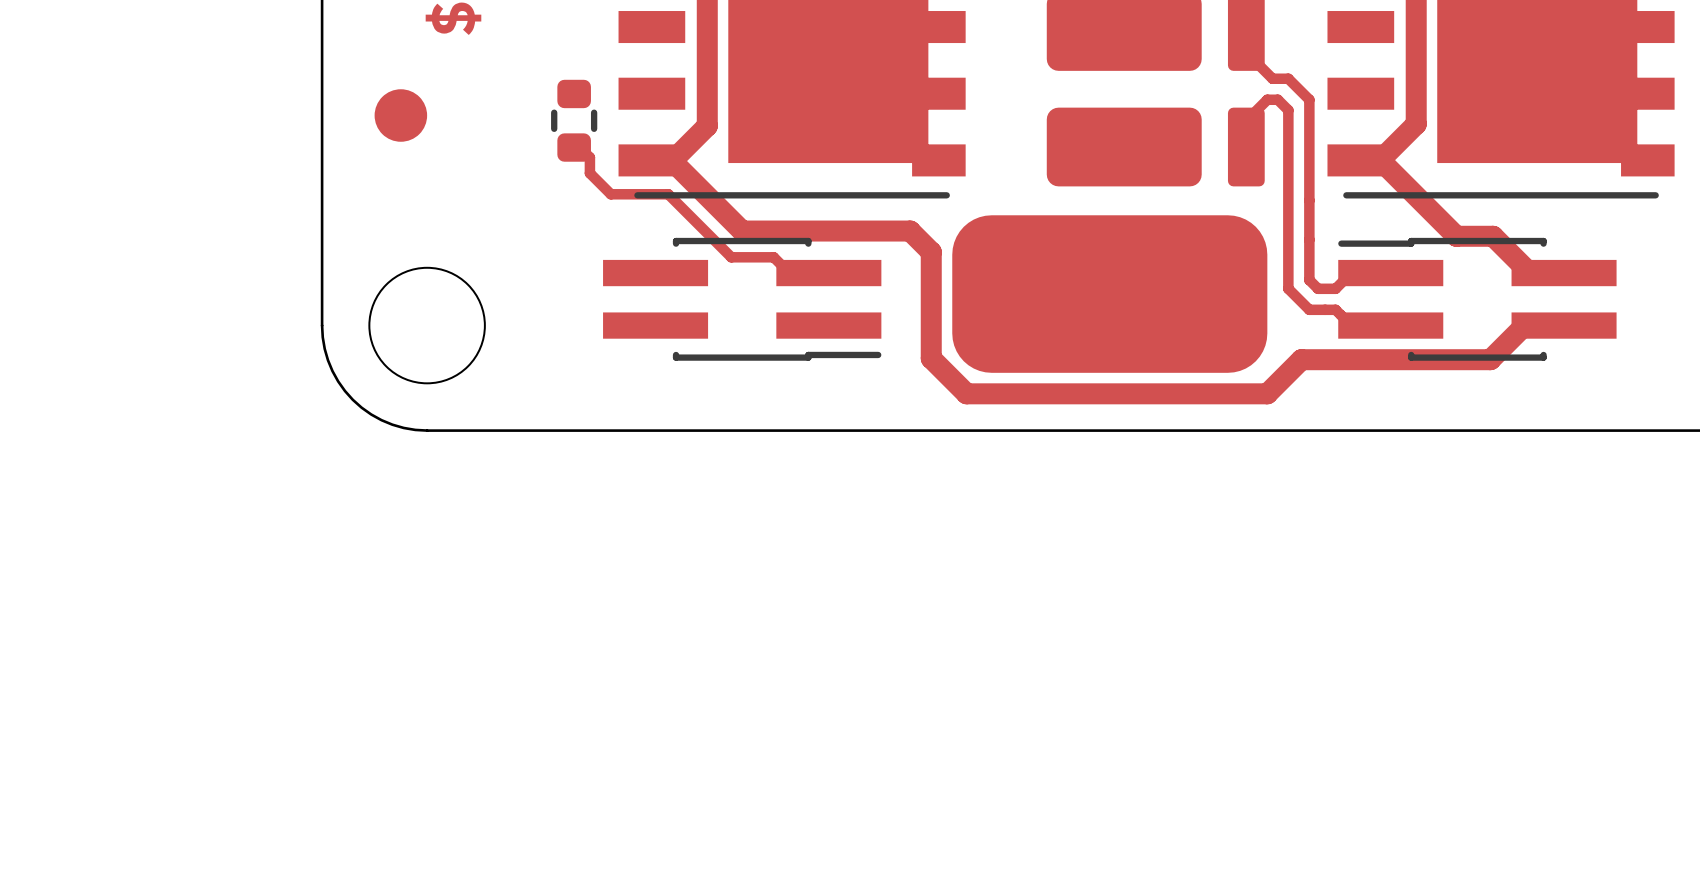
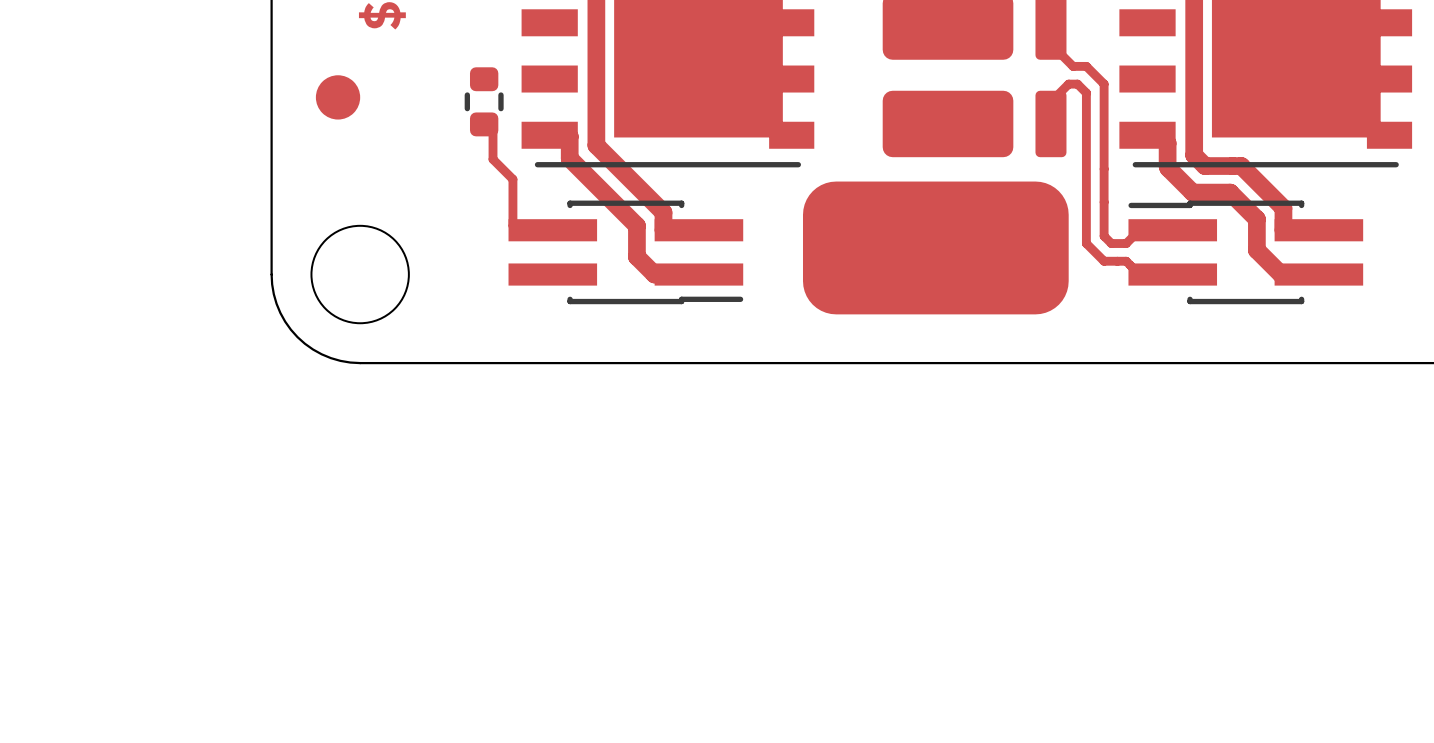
track: (1416, 124) (1379, 160) -> (1194, 104) (1194, 155) (1204, 166) (1241, 166) (1283, 208) (1283, 230) (1290, 230)
track: (707, 126) (672, 160) -> (698, 274) (654, 274) (636, 256) (636, 225) (569, 158) (569, 136) (567, 135)
track: (577, 147) (579, 147) (589, 157) (589, 173) (610, 194) (668, 194) (731, 257) (773, 257) (789, 273) -> (596, 106) (596, 145) (663, 212) (663, 230) (665, 230)
track: none -> (486, 124) (493, 130) (493, 159) (512, 179) (512, 225) (517, 230) (552, 230)
track: (671, 160) (742, 231) (910, 231) (931, 252) (931, 358) (966, 393) (1267, 393) (1301, 359) (1490, 359) (1524, 325) -> none
track: (1375, 160) (1380, 160) (1456, 236) (1493, 236) (1529, 273) -> (1159, 135) (1167, 143) (1168, 168) (1192, 192) (1230, 192) (1256, 219) (1256, 250) (1281, 274) (1285, 274)

